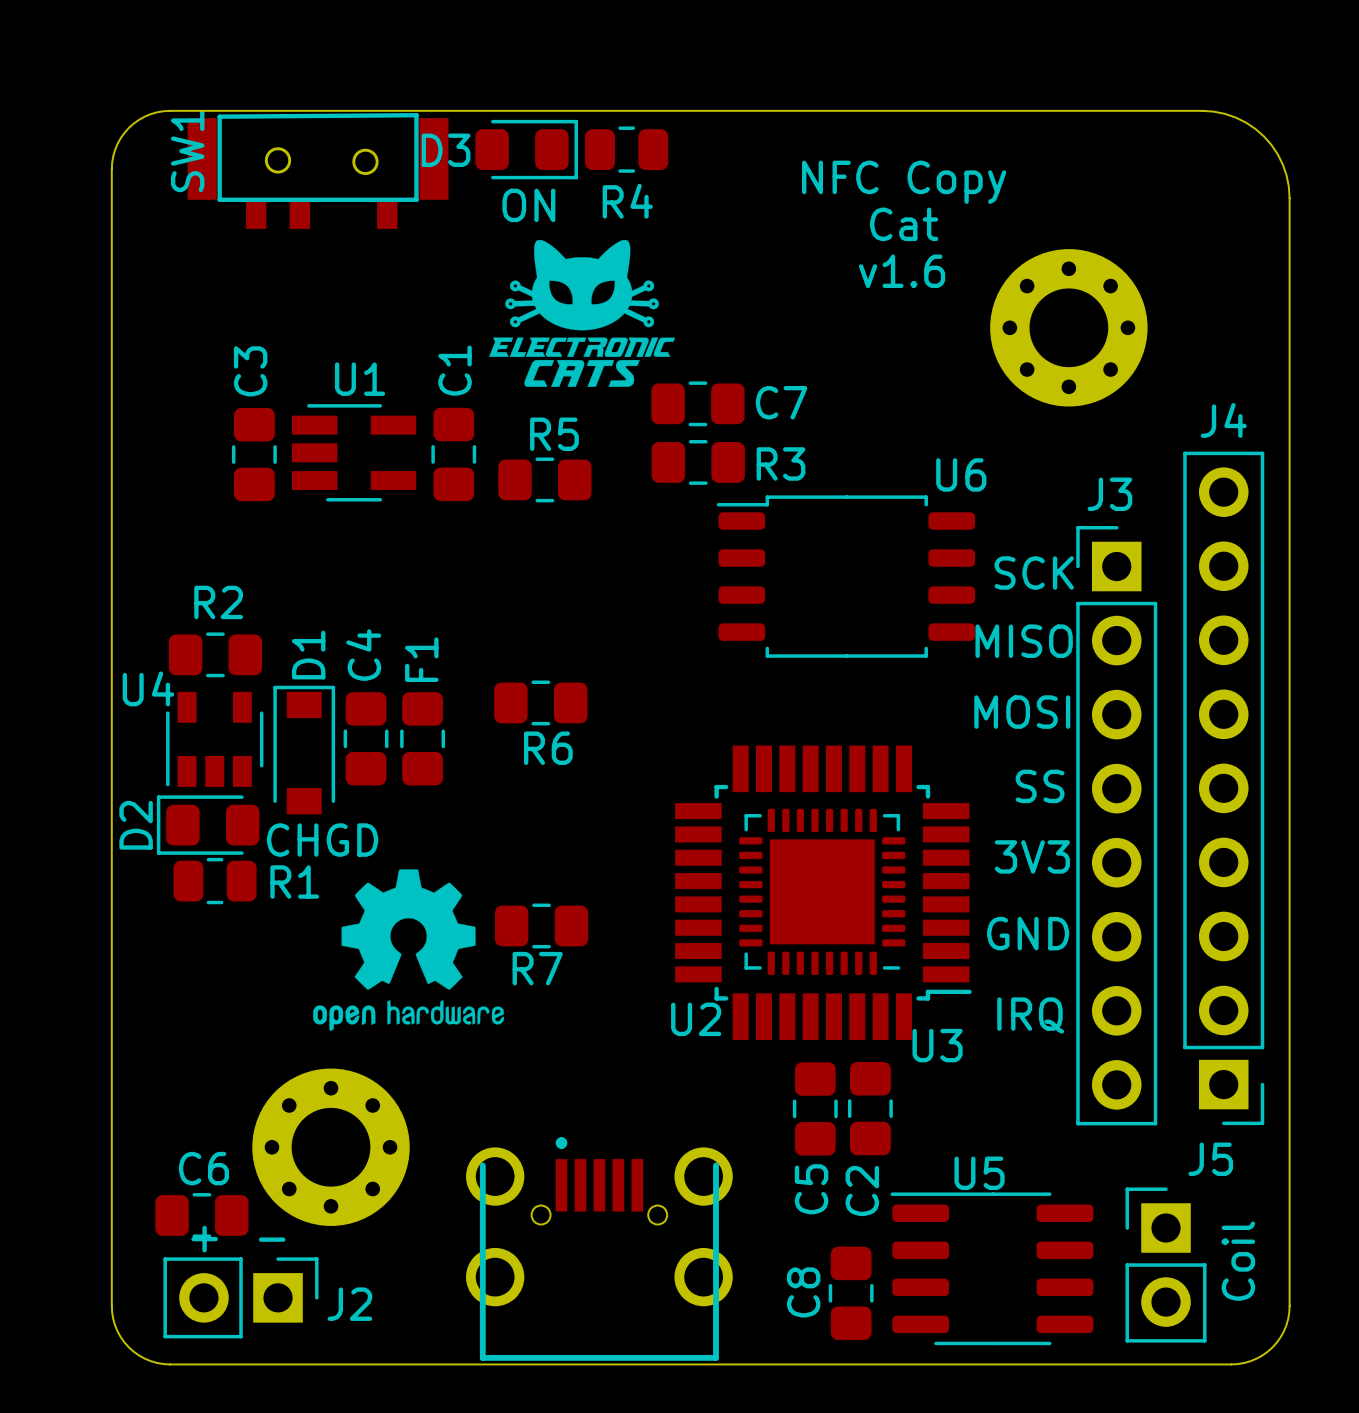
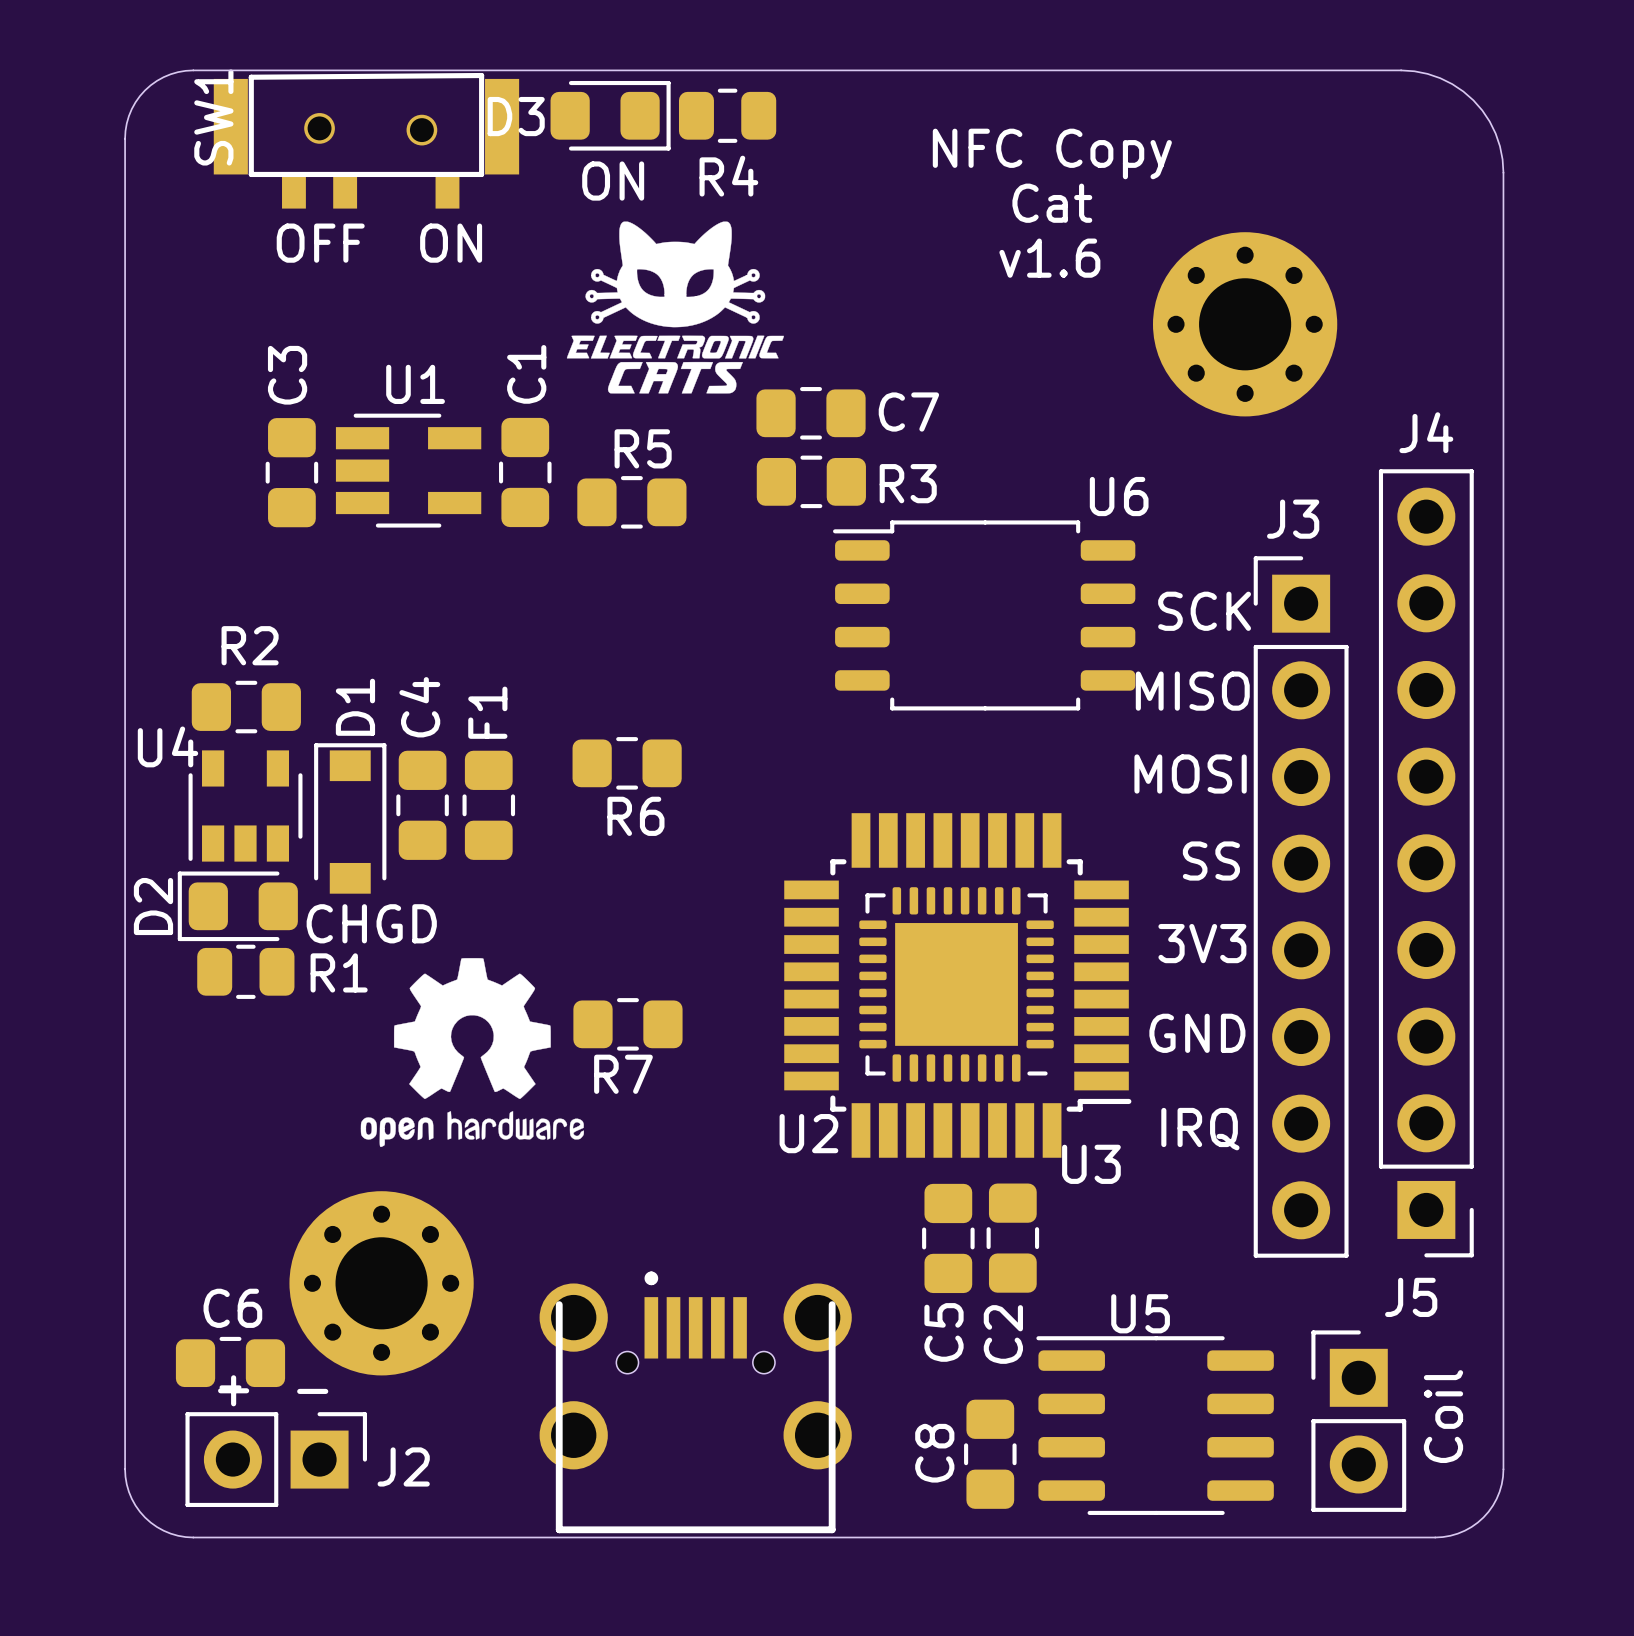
text: none -> OFF (320, 243)
text: none -> ON (451, 243)

